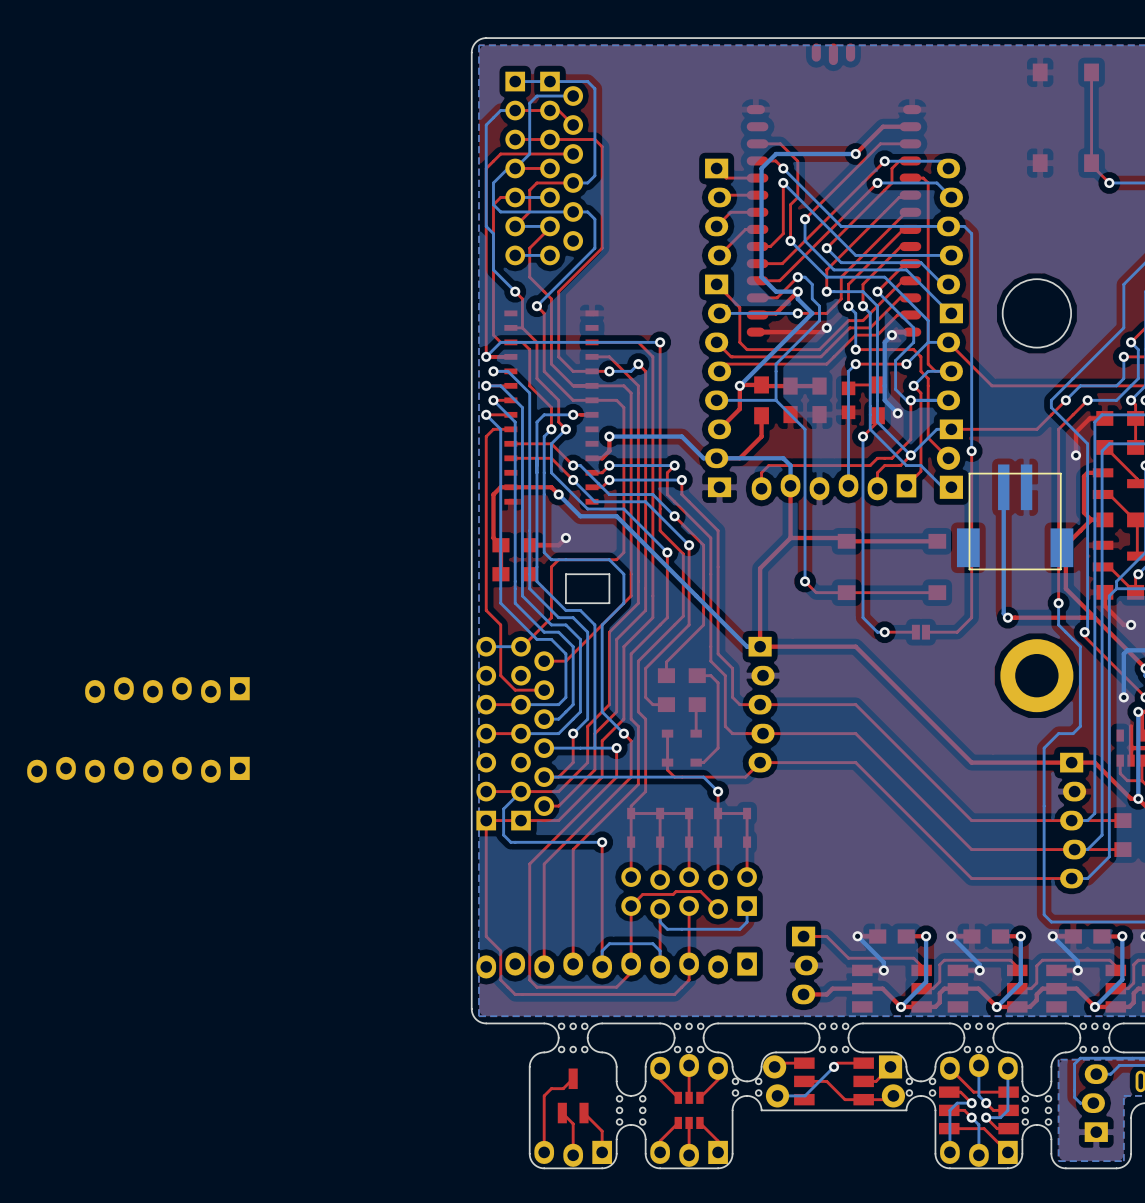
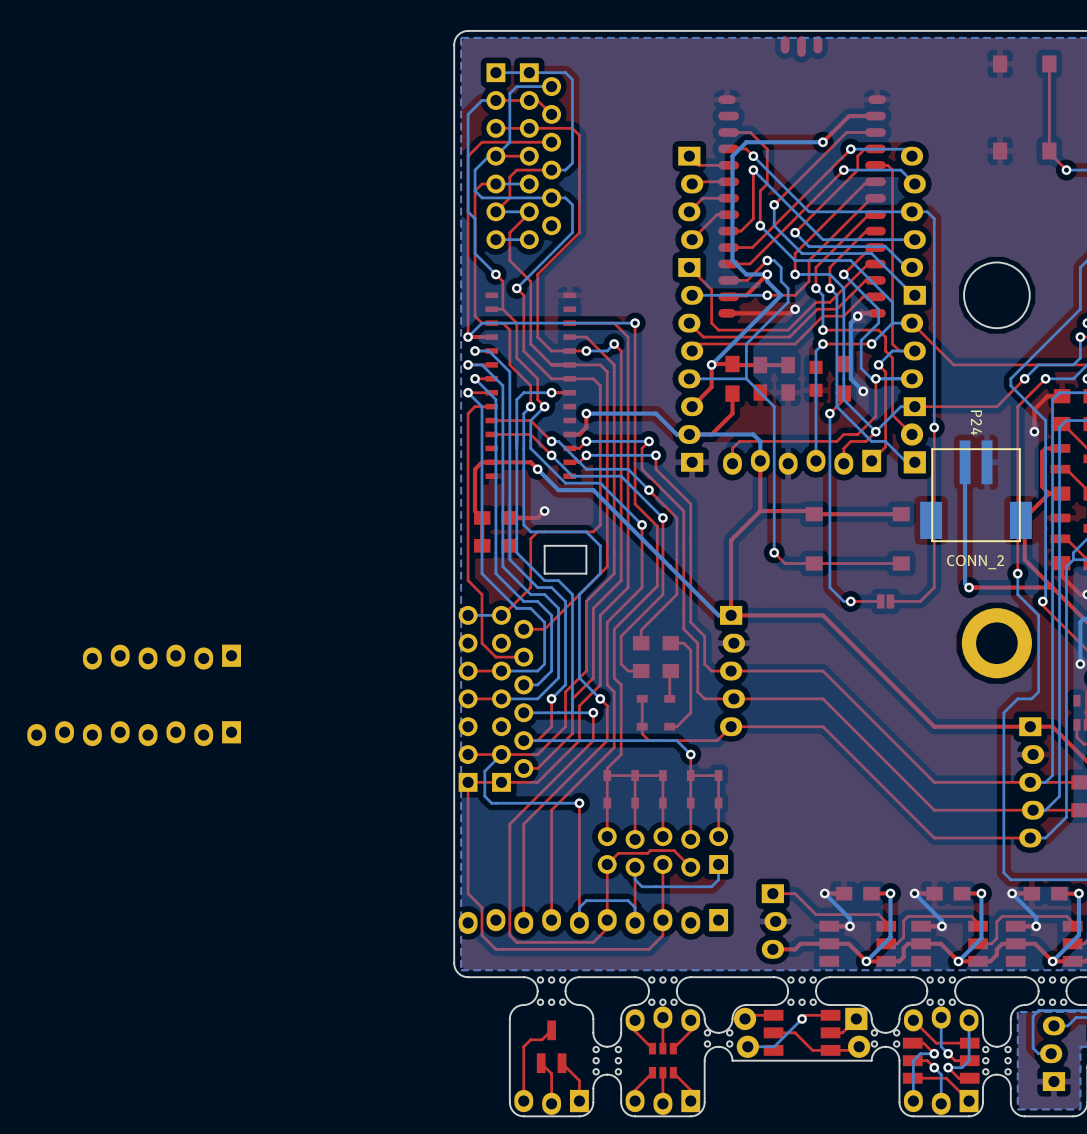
top track: (877, 384) (851, 384) (848, 388) -> none
P24 name: none -> P24 (976, 422)
P24 value: none -> CONN_2 (975, 562)

